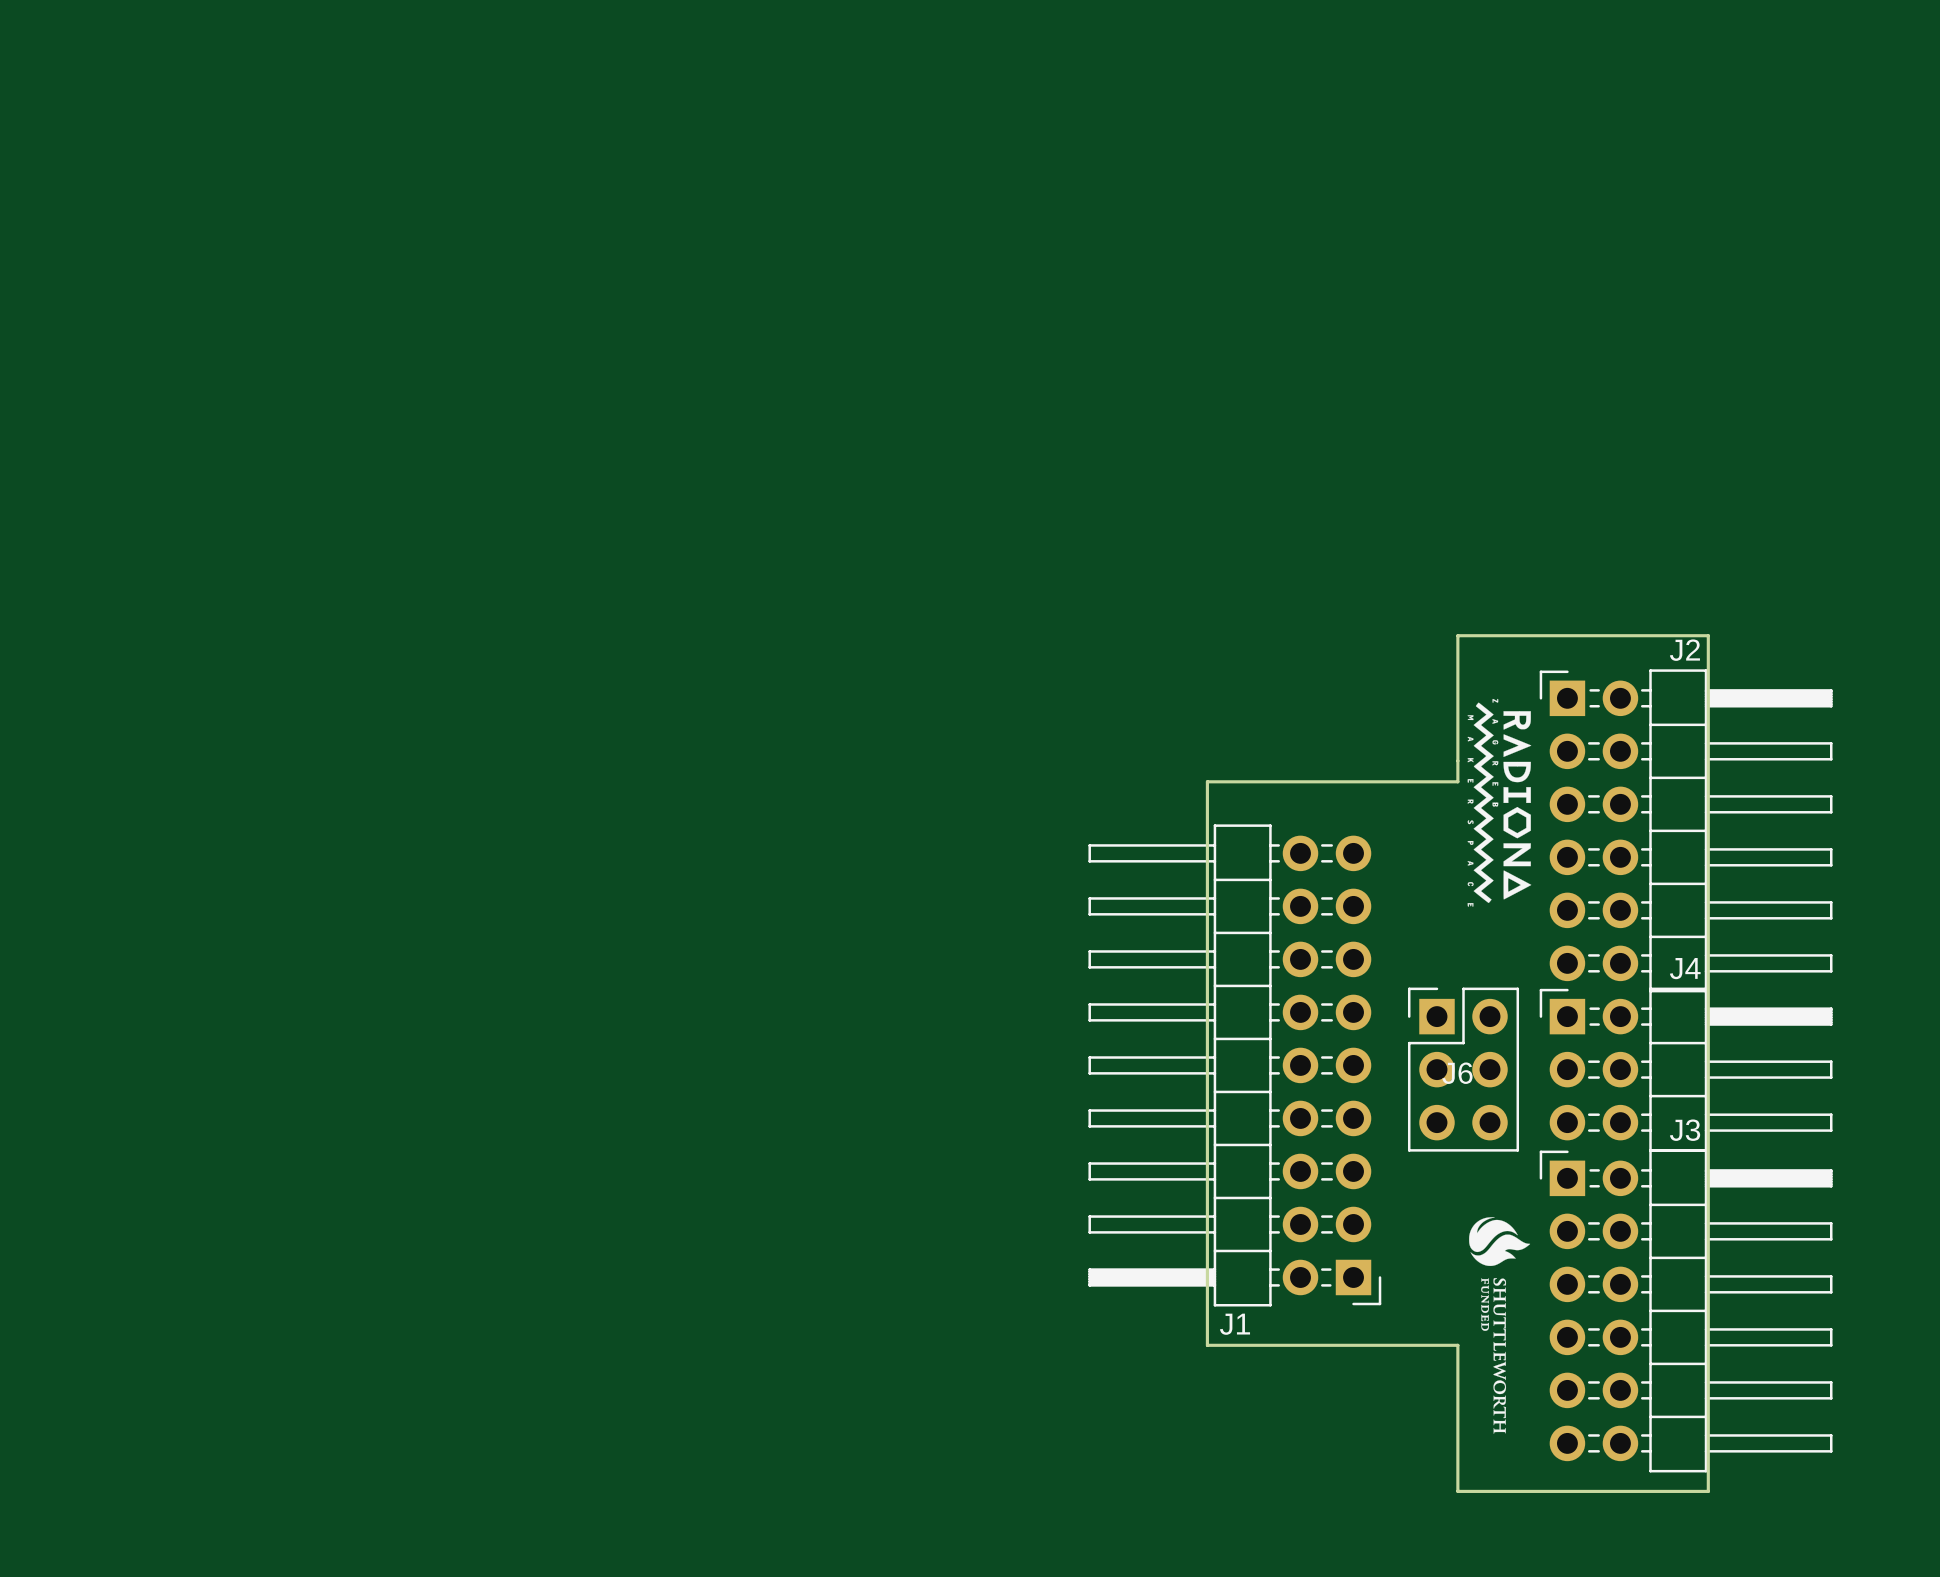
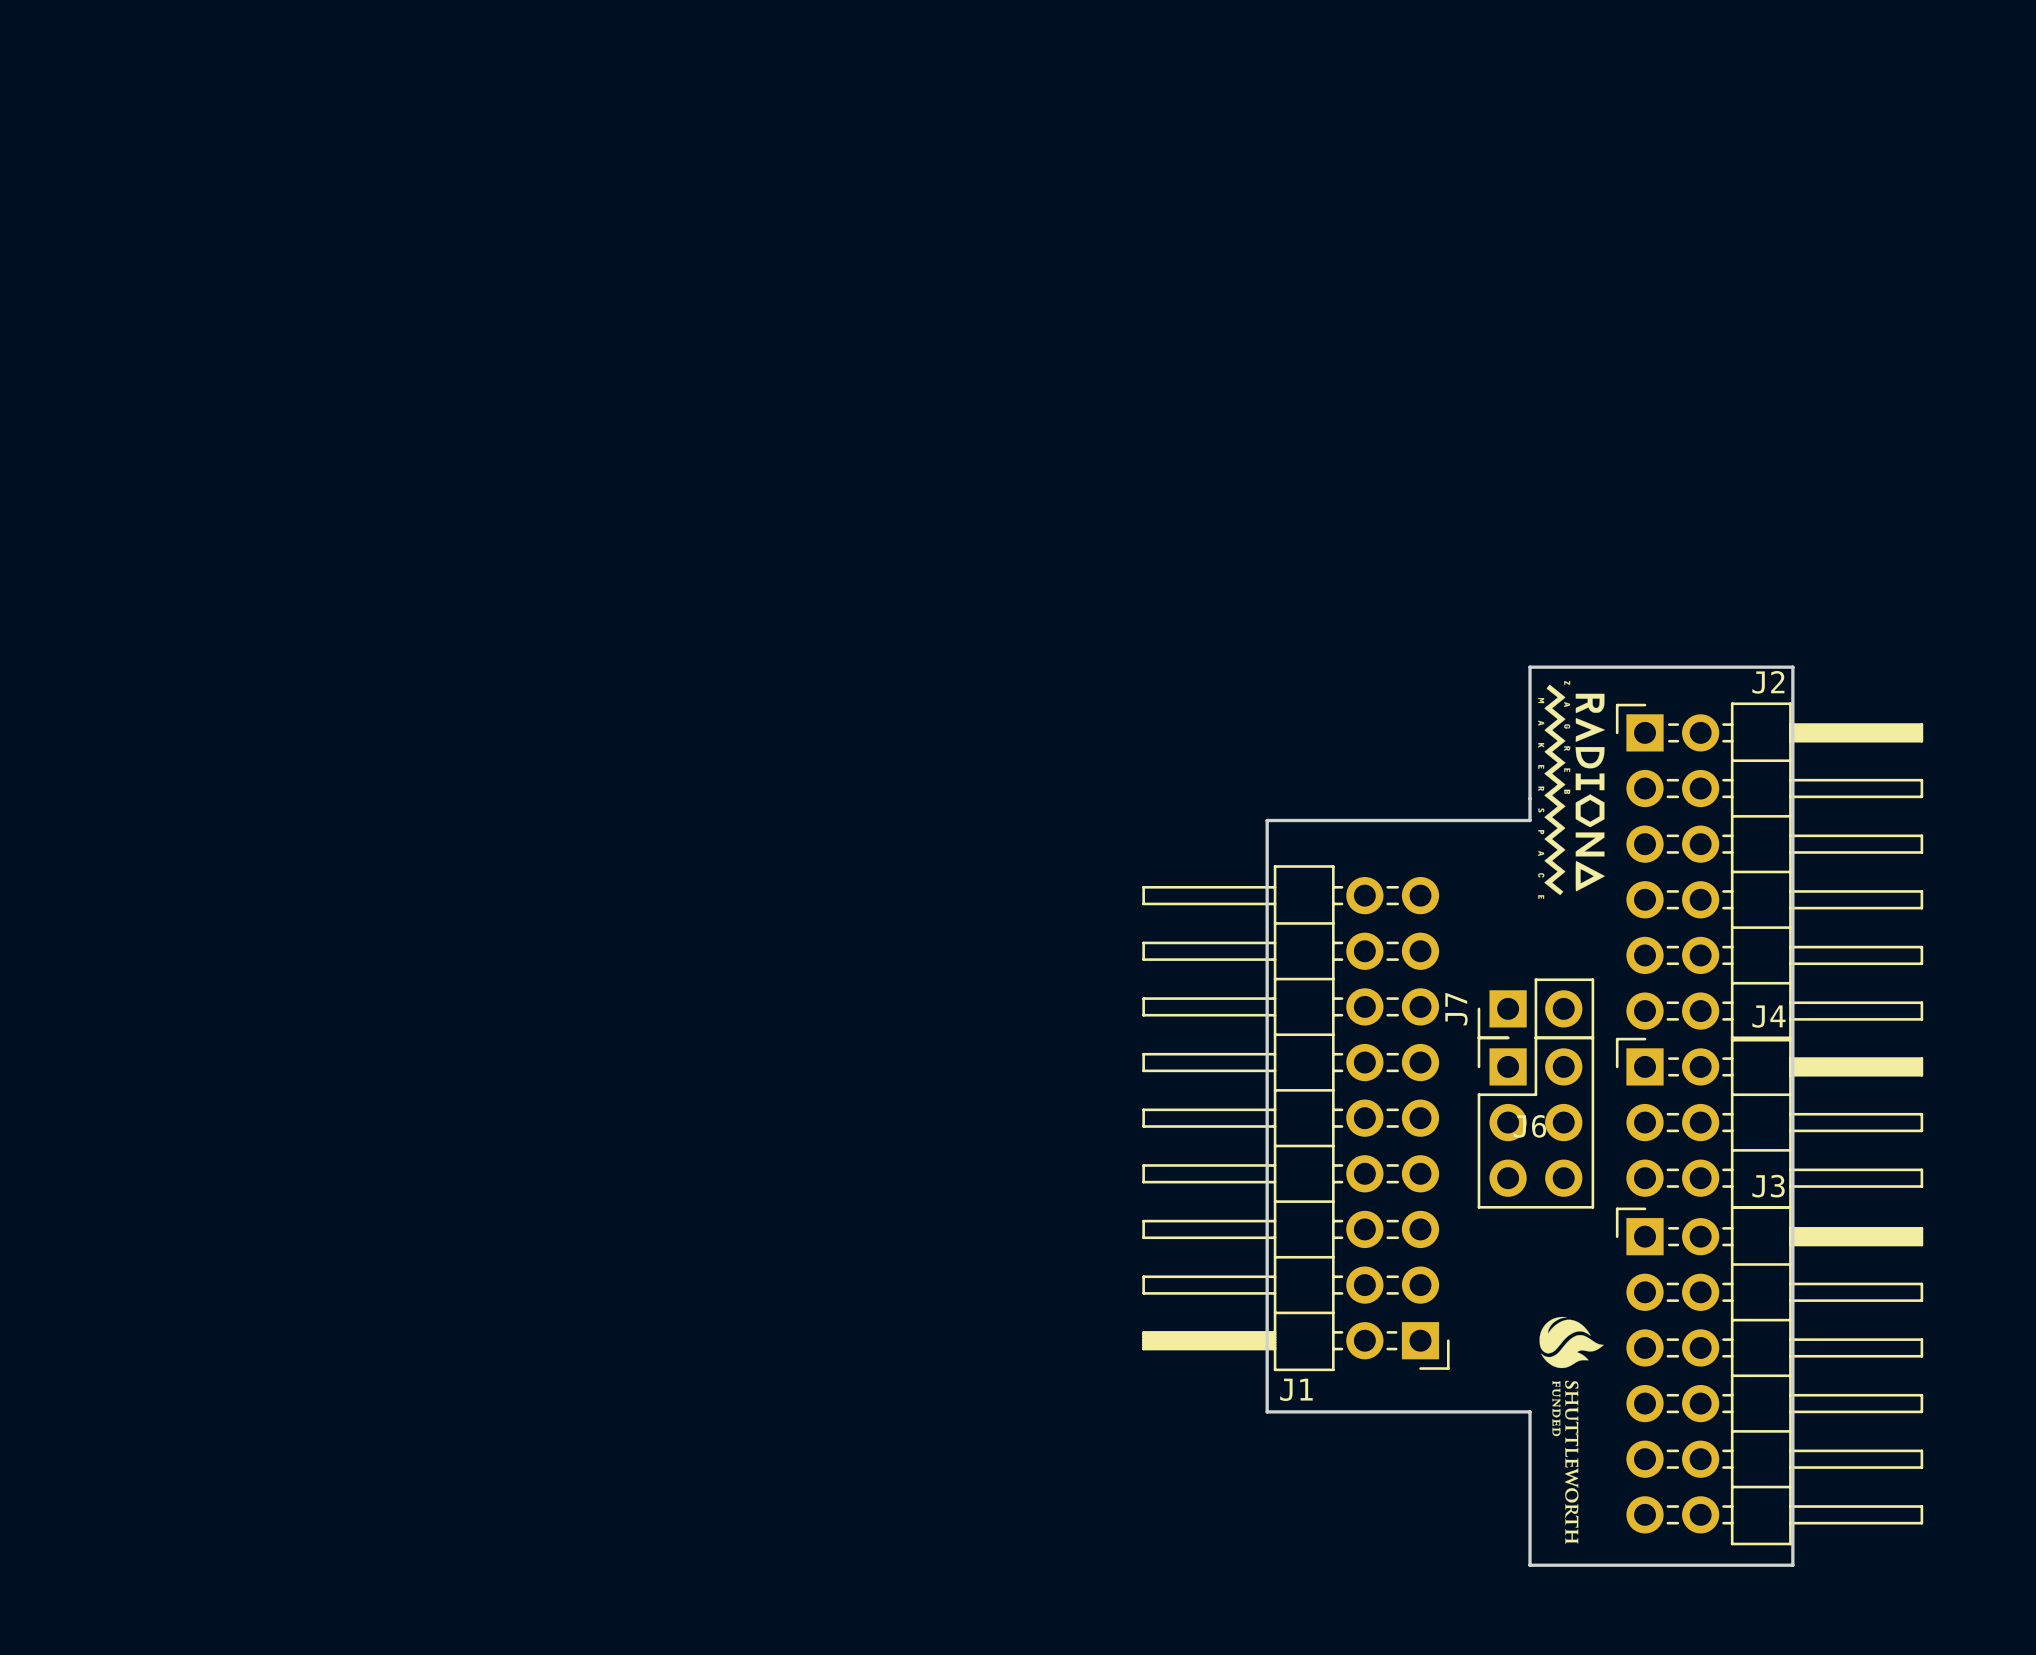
drawing position: (1499, 802) -> (1571, 789)
J7: none -> (1535, 1008)
drawing position: (1499, 1325) -> (1571, 1430)

